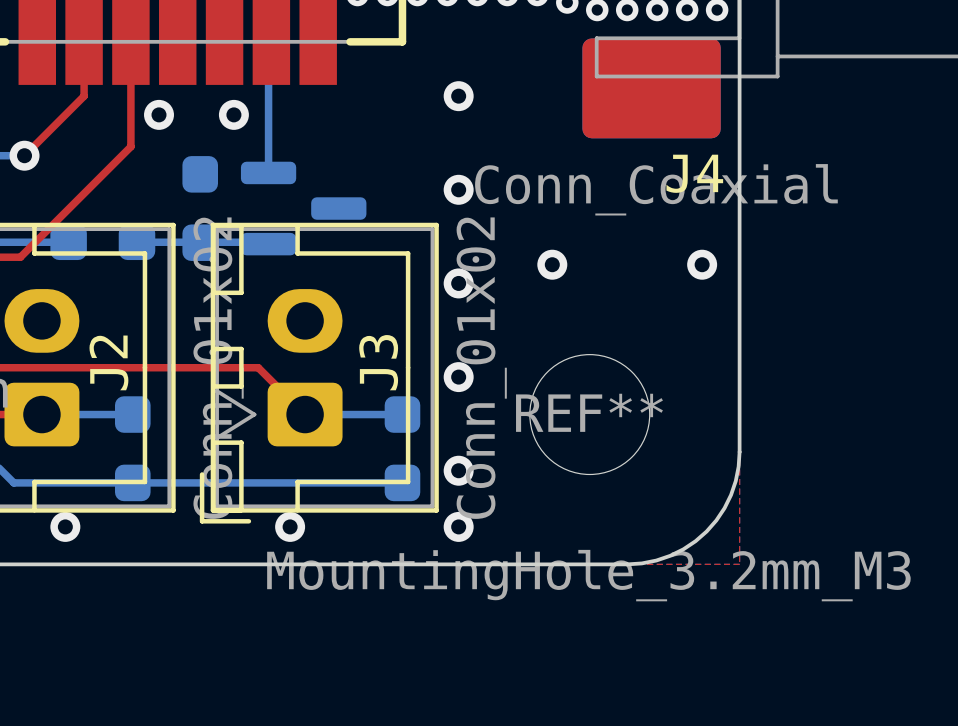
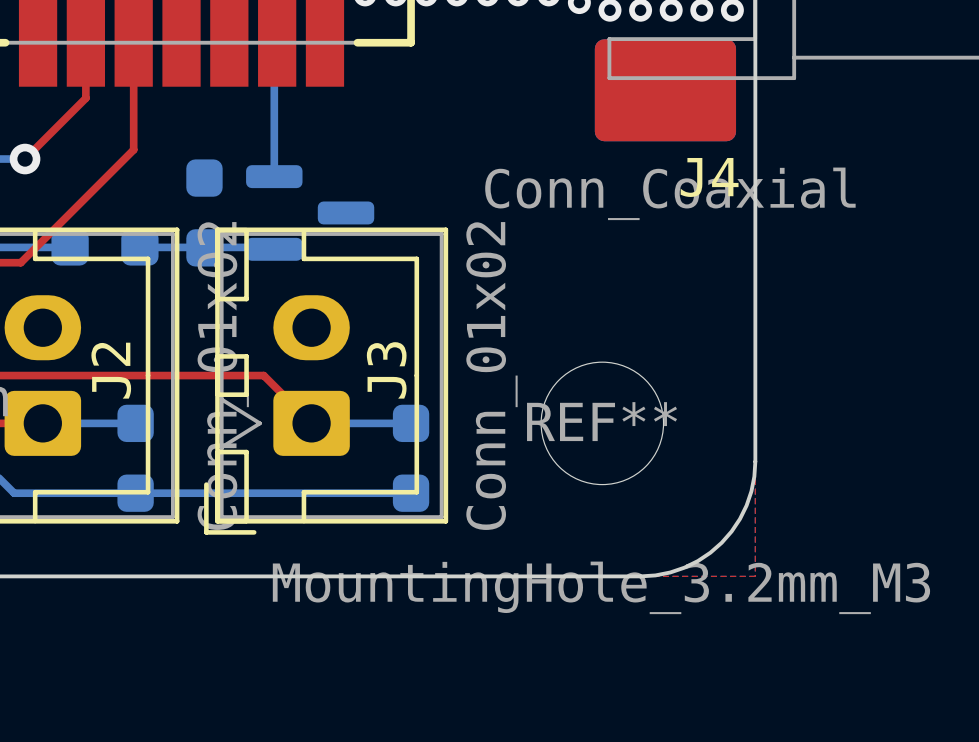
via: (458, 96) -> none
via: (159, 114) -> none
via: (233, 114) -> none
via: (458, 189) -> none
via: (552, 264) -> none
via: (702, 264) -> none
via: (458, 283) -> none
via: (458, 377) -> none
via: (458, 470) -> none
via: (65, 526) -> none
via: (290, 526) -> none
via: (458, 526) -> none

